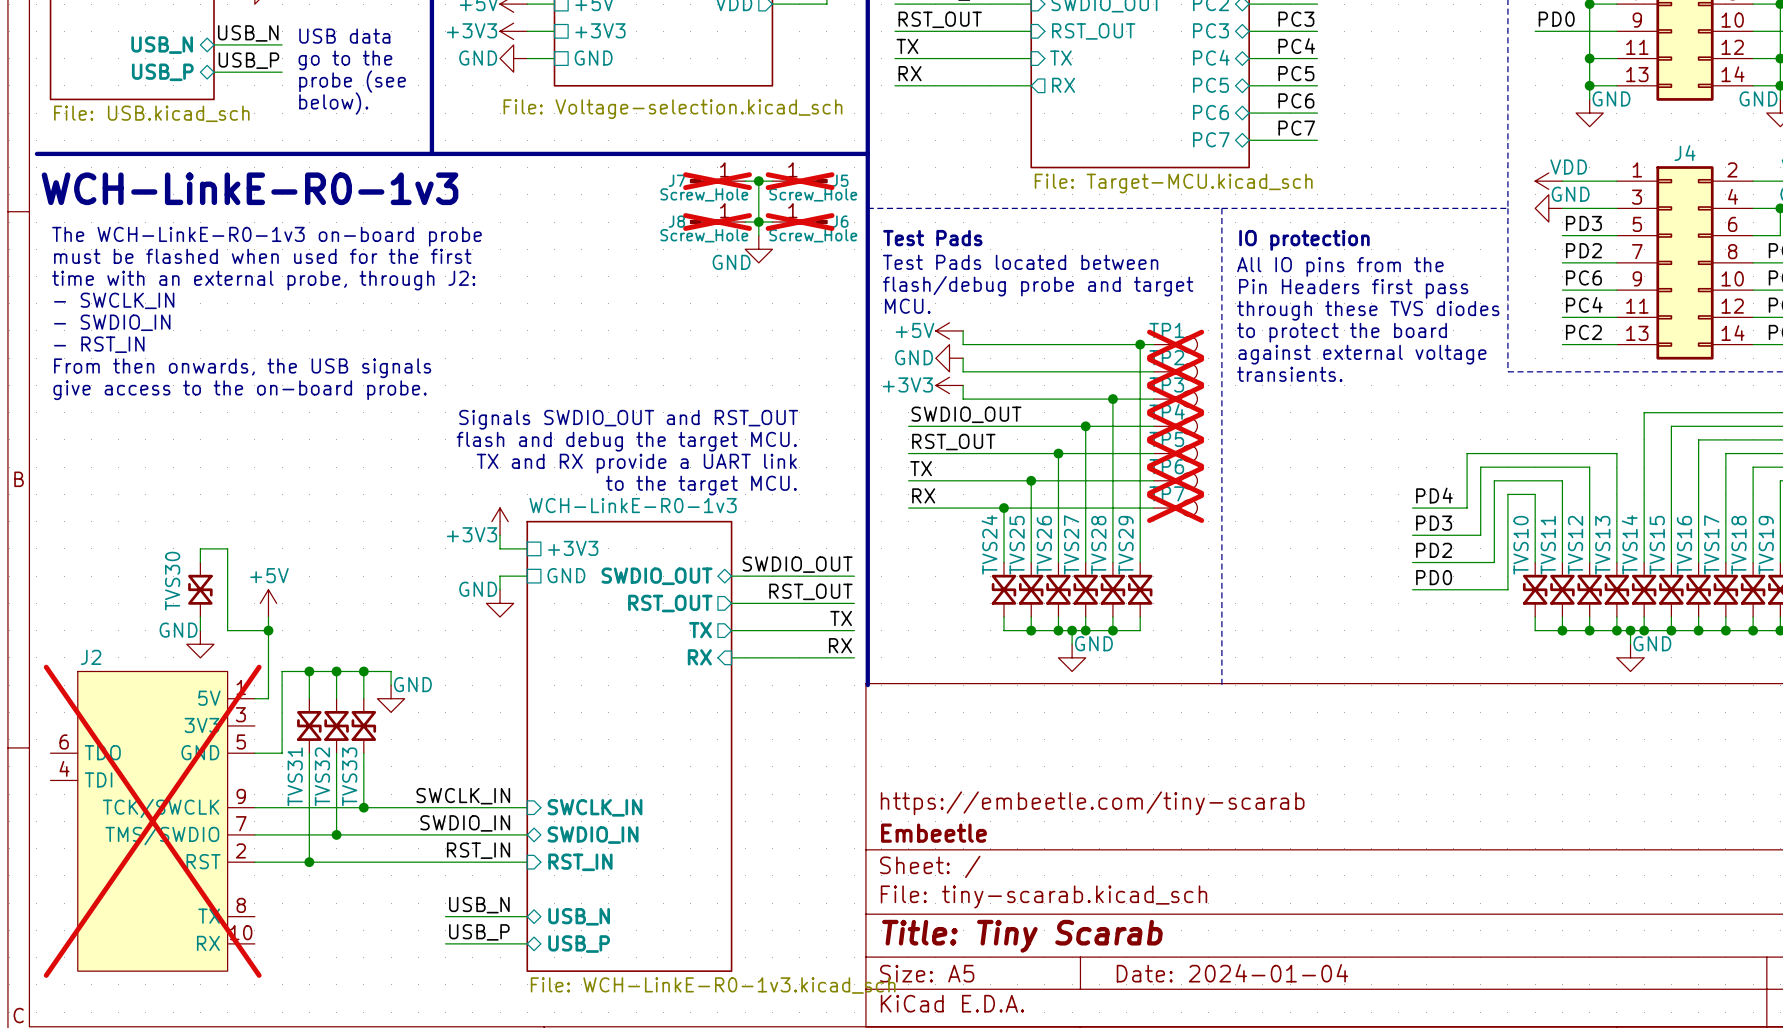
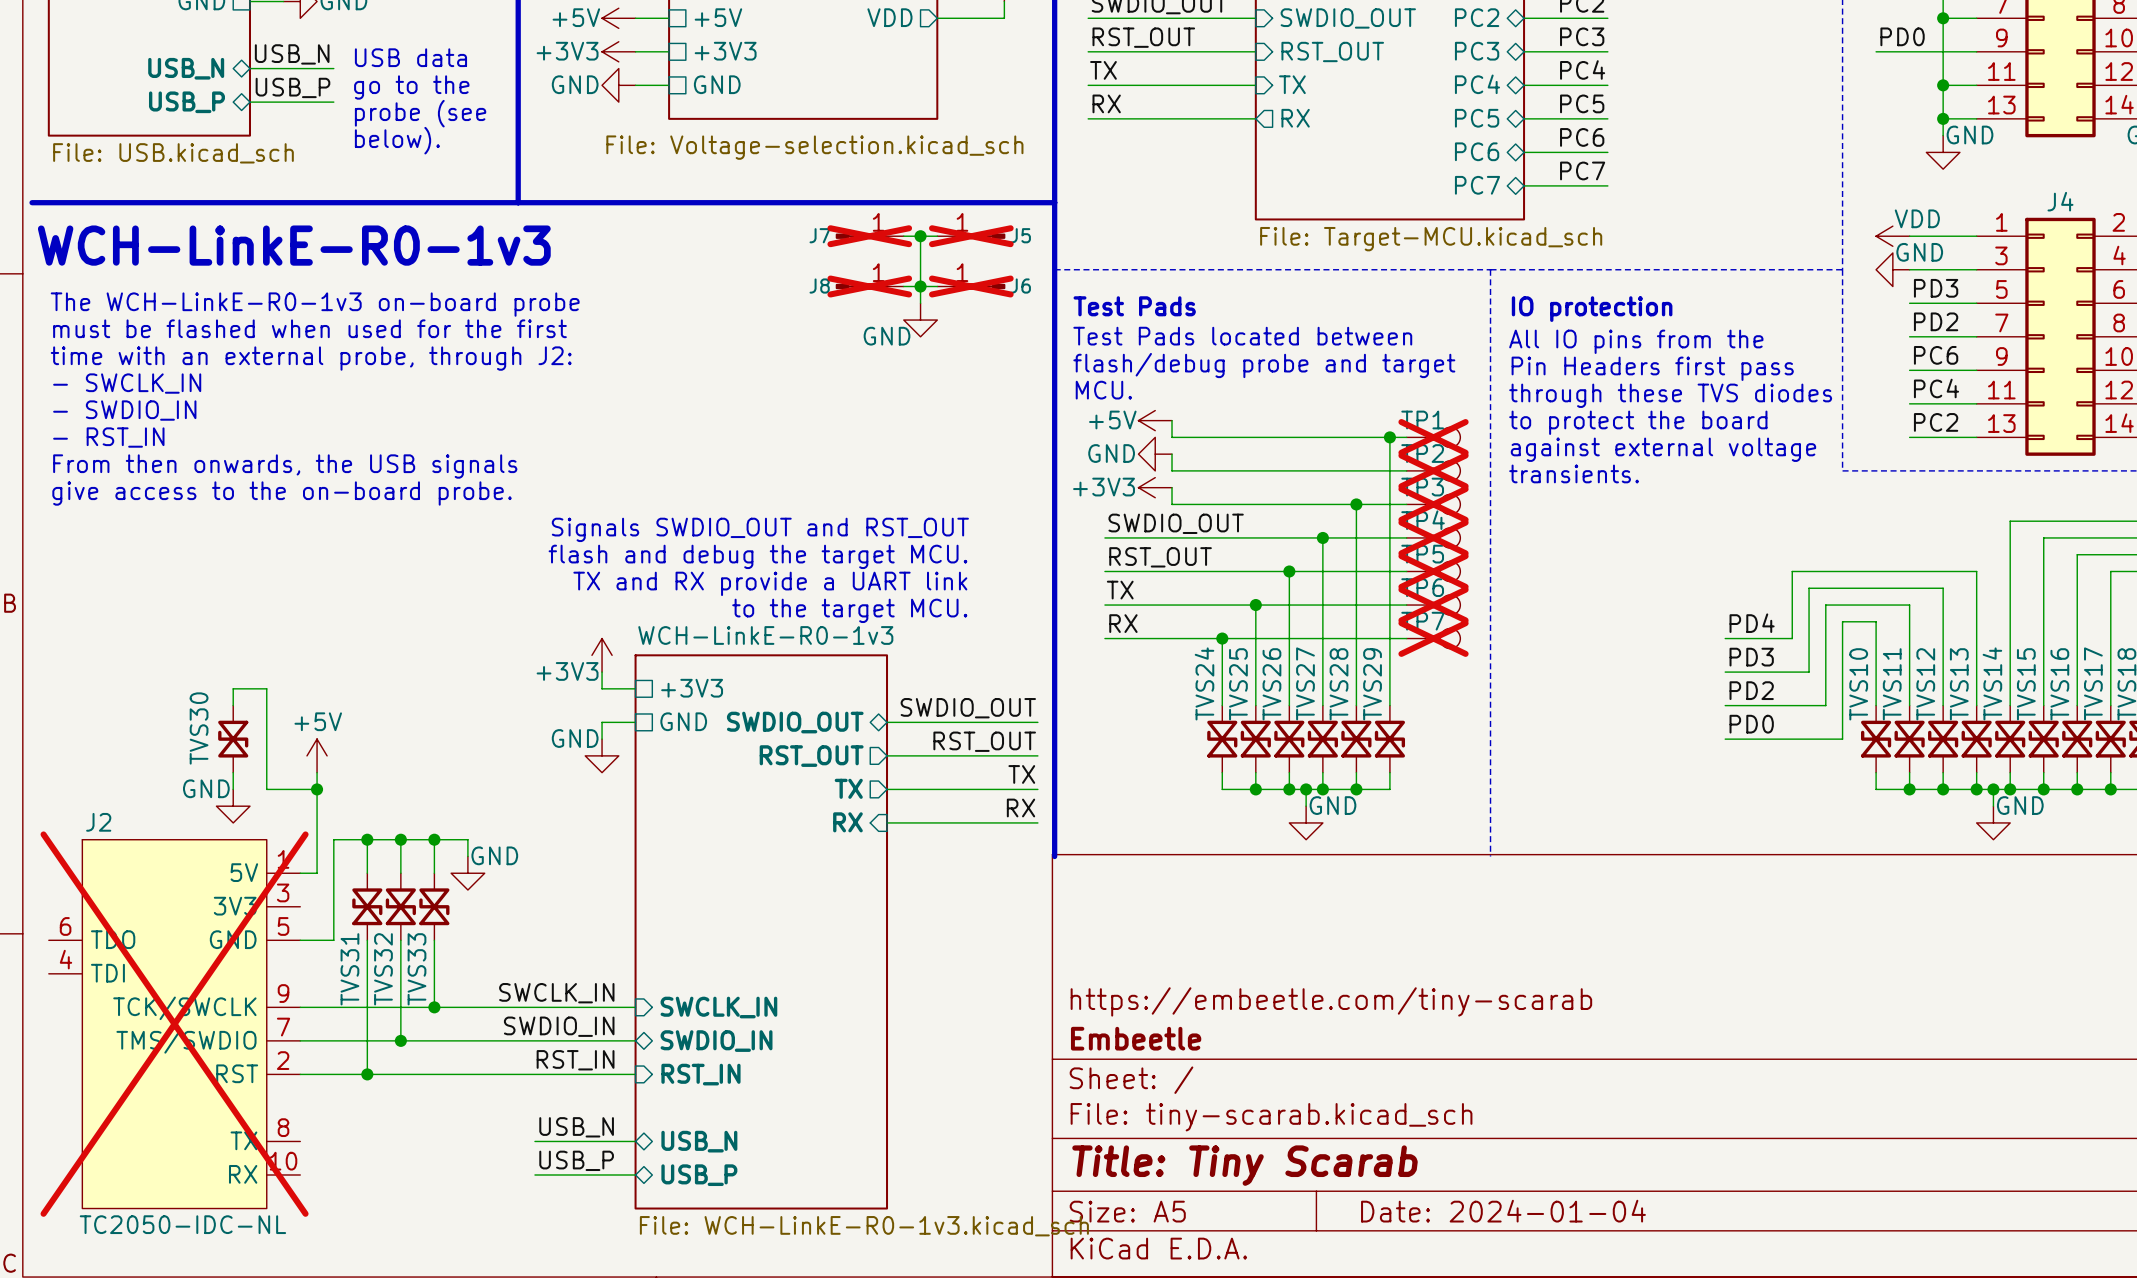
J7 value: Screw_Hole (704, 194) -> none
J5 value: Screw_Hole (813, 194) -> none
J8 value: Screw_Hole (704, 235) -> none
J6 value: Screw_Hole (813, 235) -> none
J2 value: none -> TC2050-IDC-NL (182, 1224)

